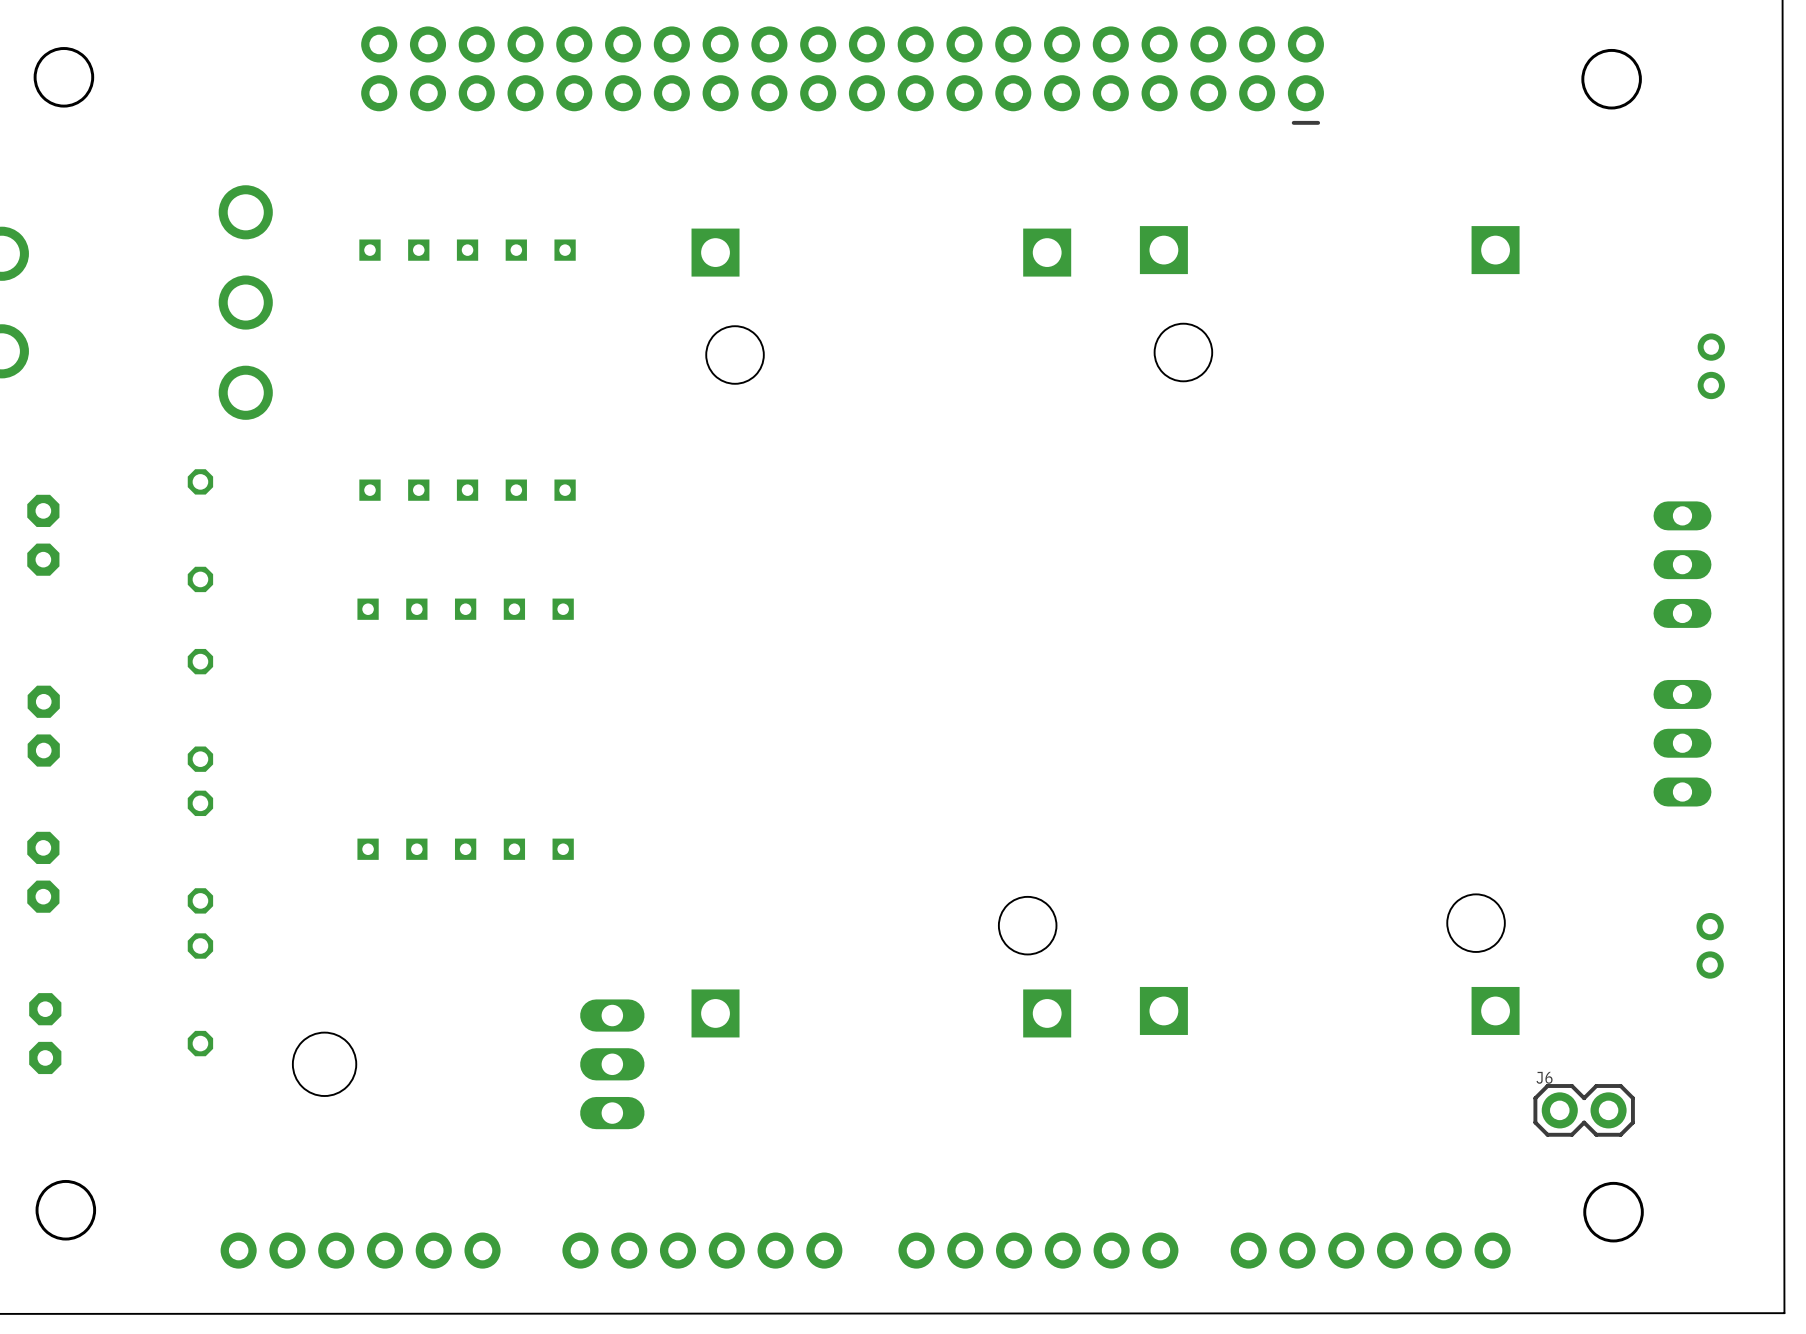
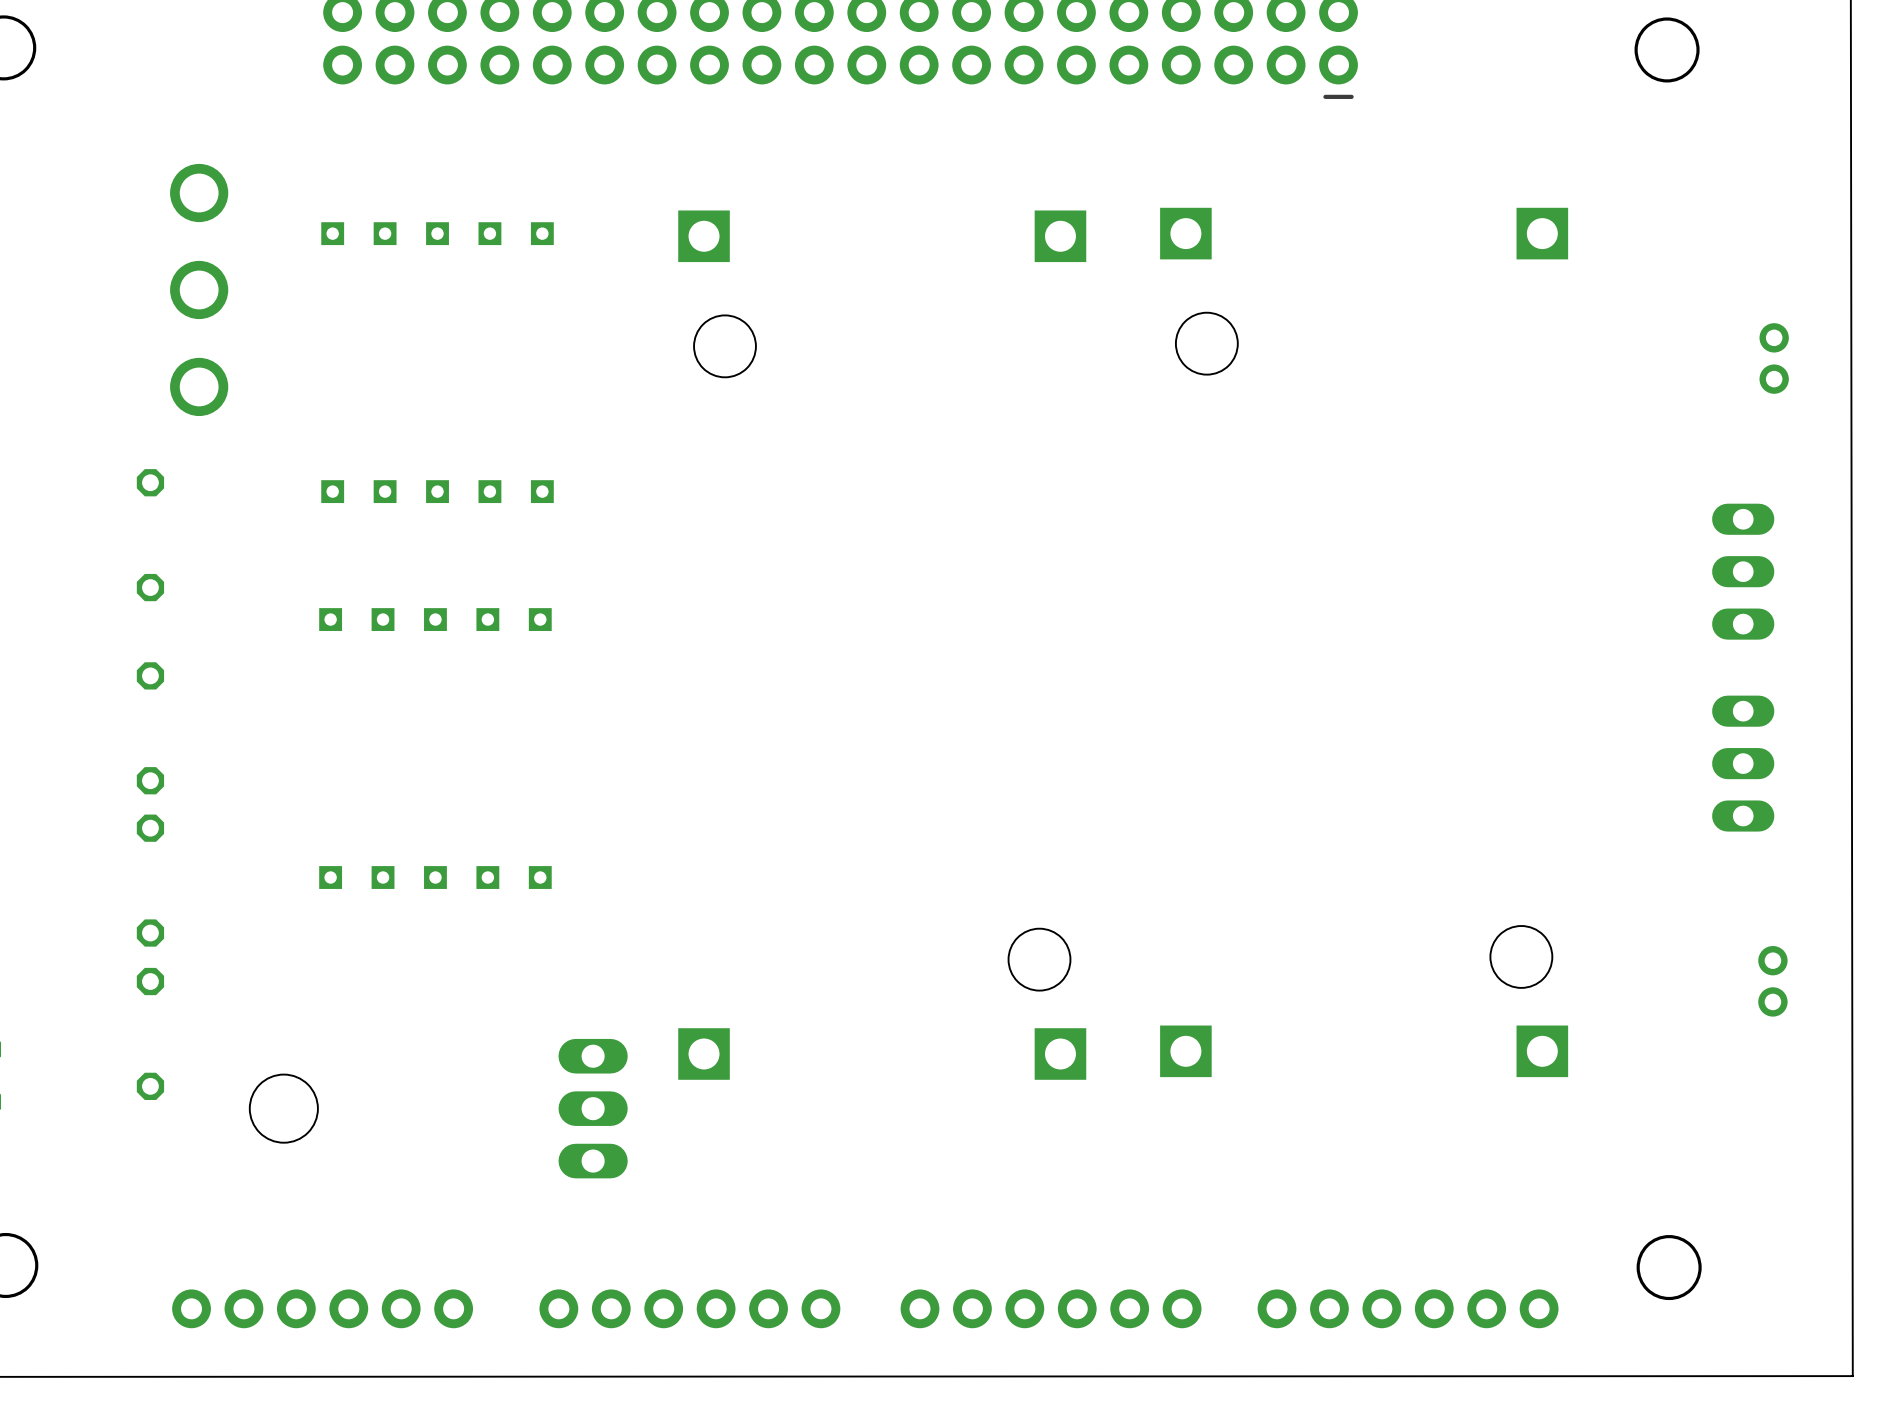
J6: (1584, 1110) -> none

